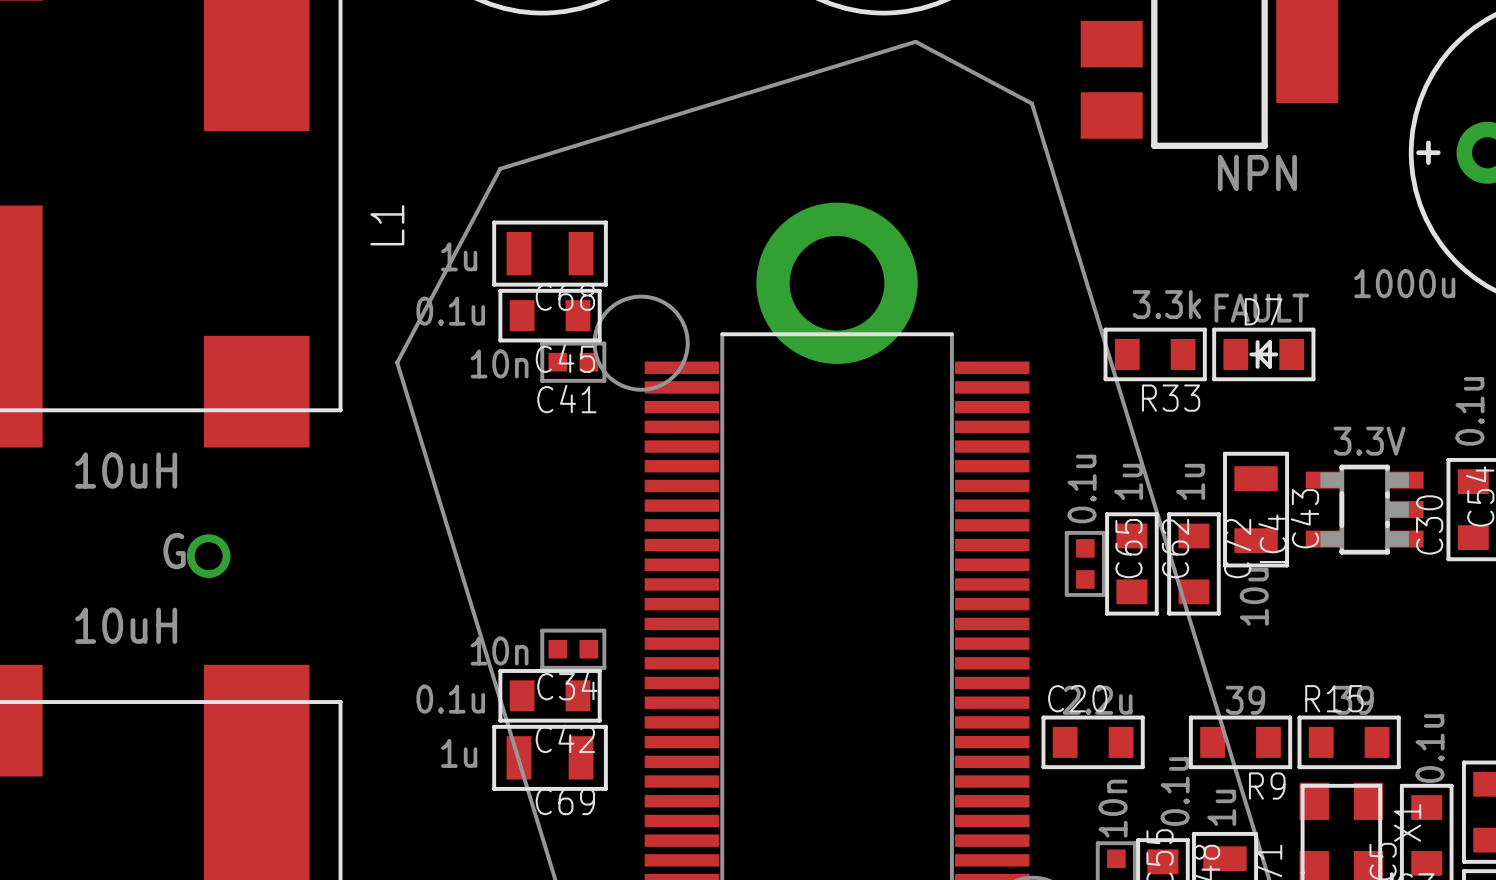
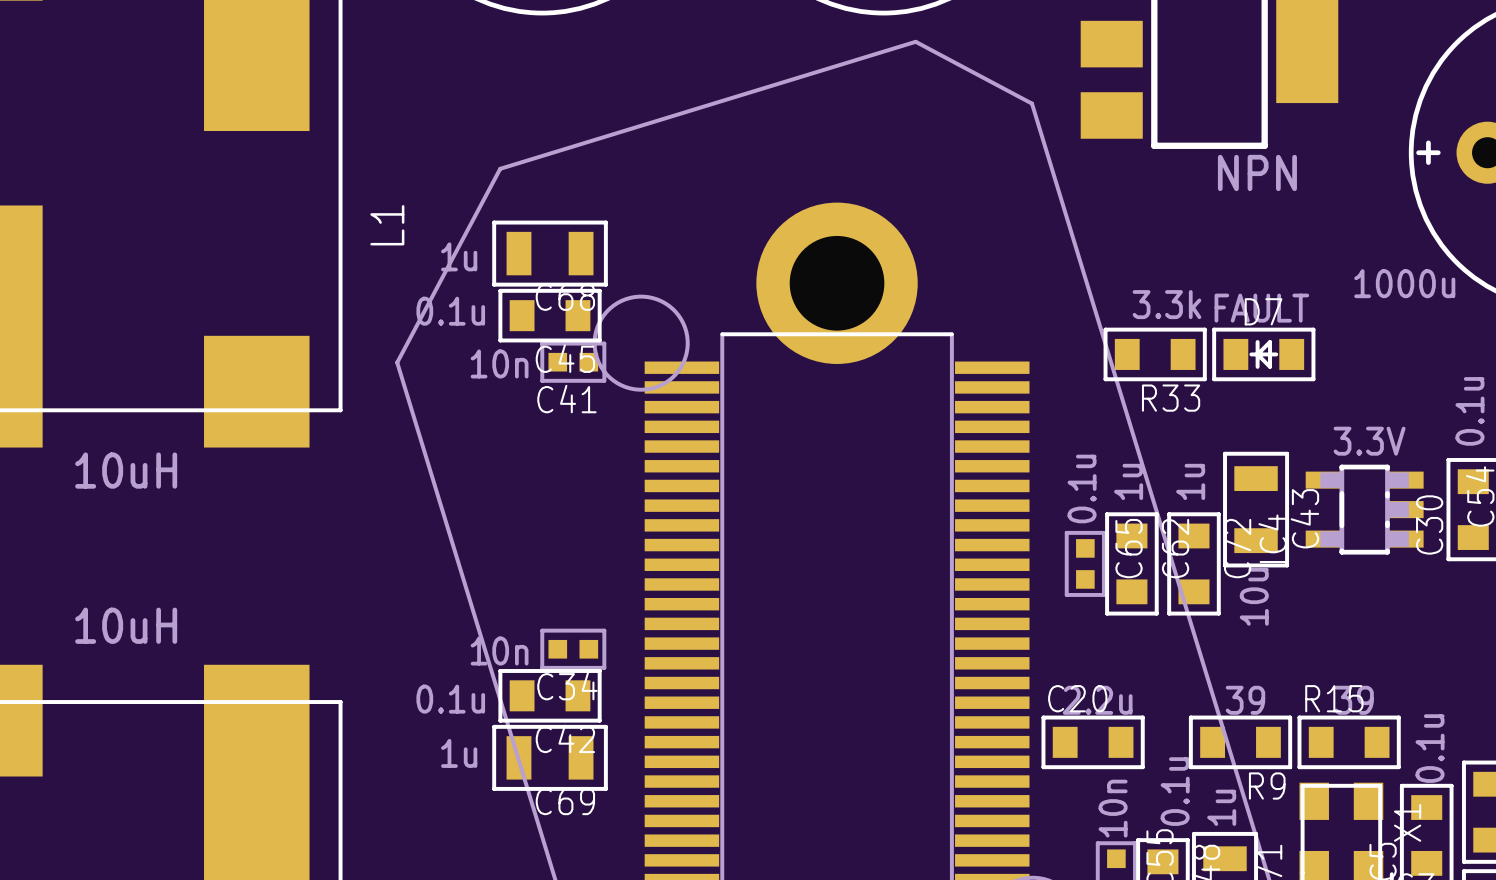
part: G (208, 556) -> none

